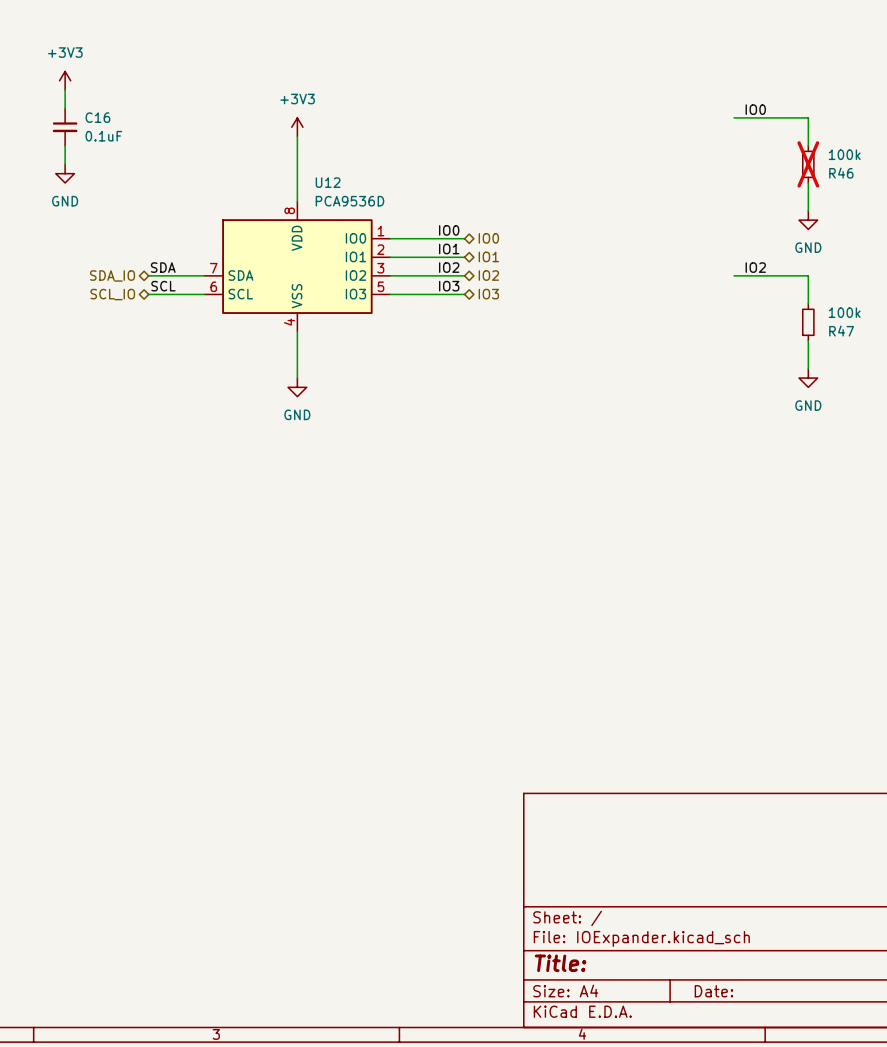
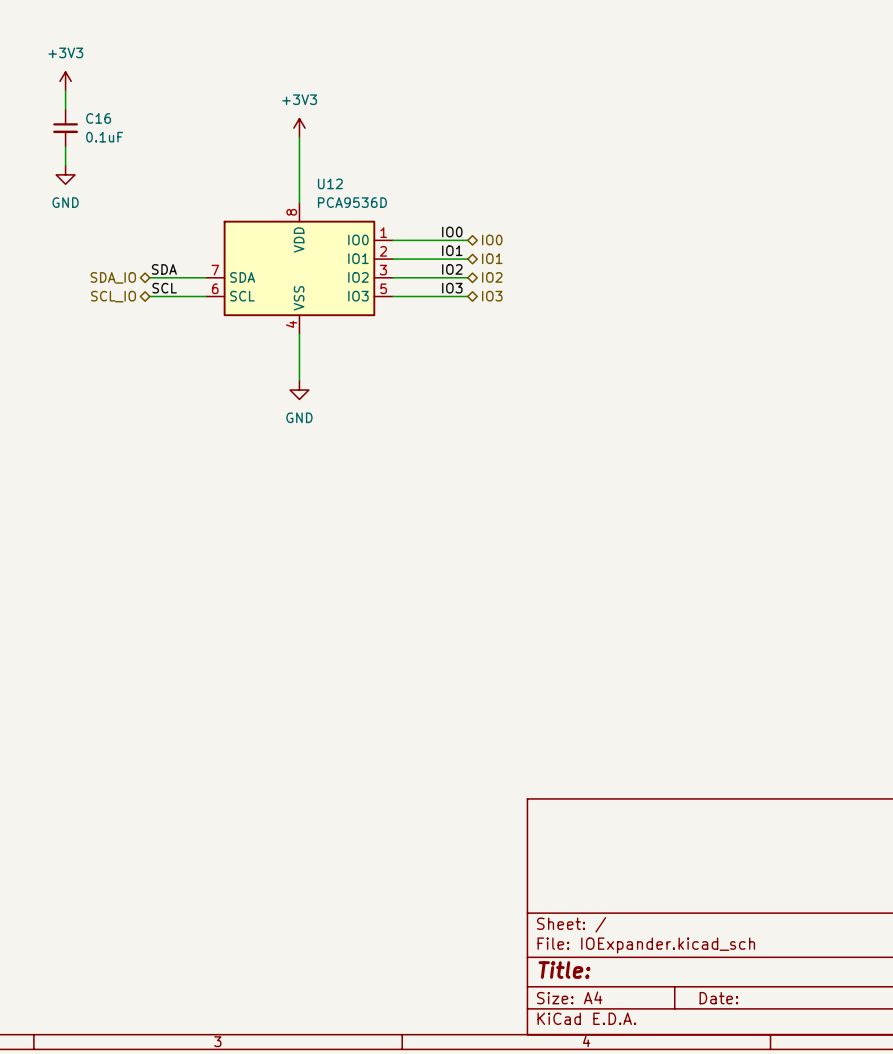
label: IO0 (755, 109) -> none
wire: (734, 117) (808, 117) (808, 145) -> none
R46: 100k (808, 164) -> none
wire: (808, 182) (808, 210) -> none
power symbol: GND (808, 220) -> none
label: IO2 (755, 267) -> none
wire: (734, 275) (808, 275) (808, 303) -> none
R47: 100k (808, 322) -> none
wire: (808, 340) (808, 368) -> none
power symbol: GND (808, 378) -> none

